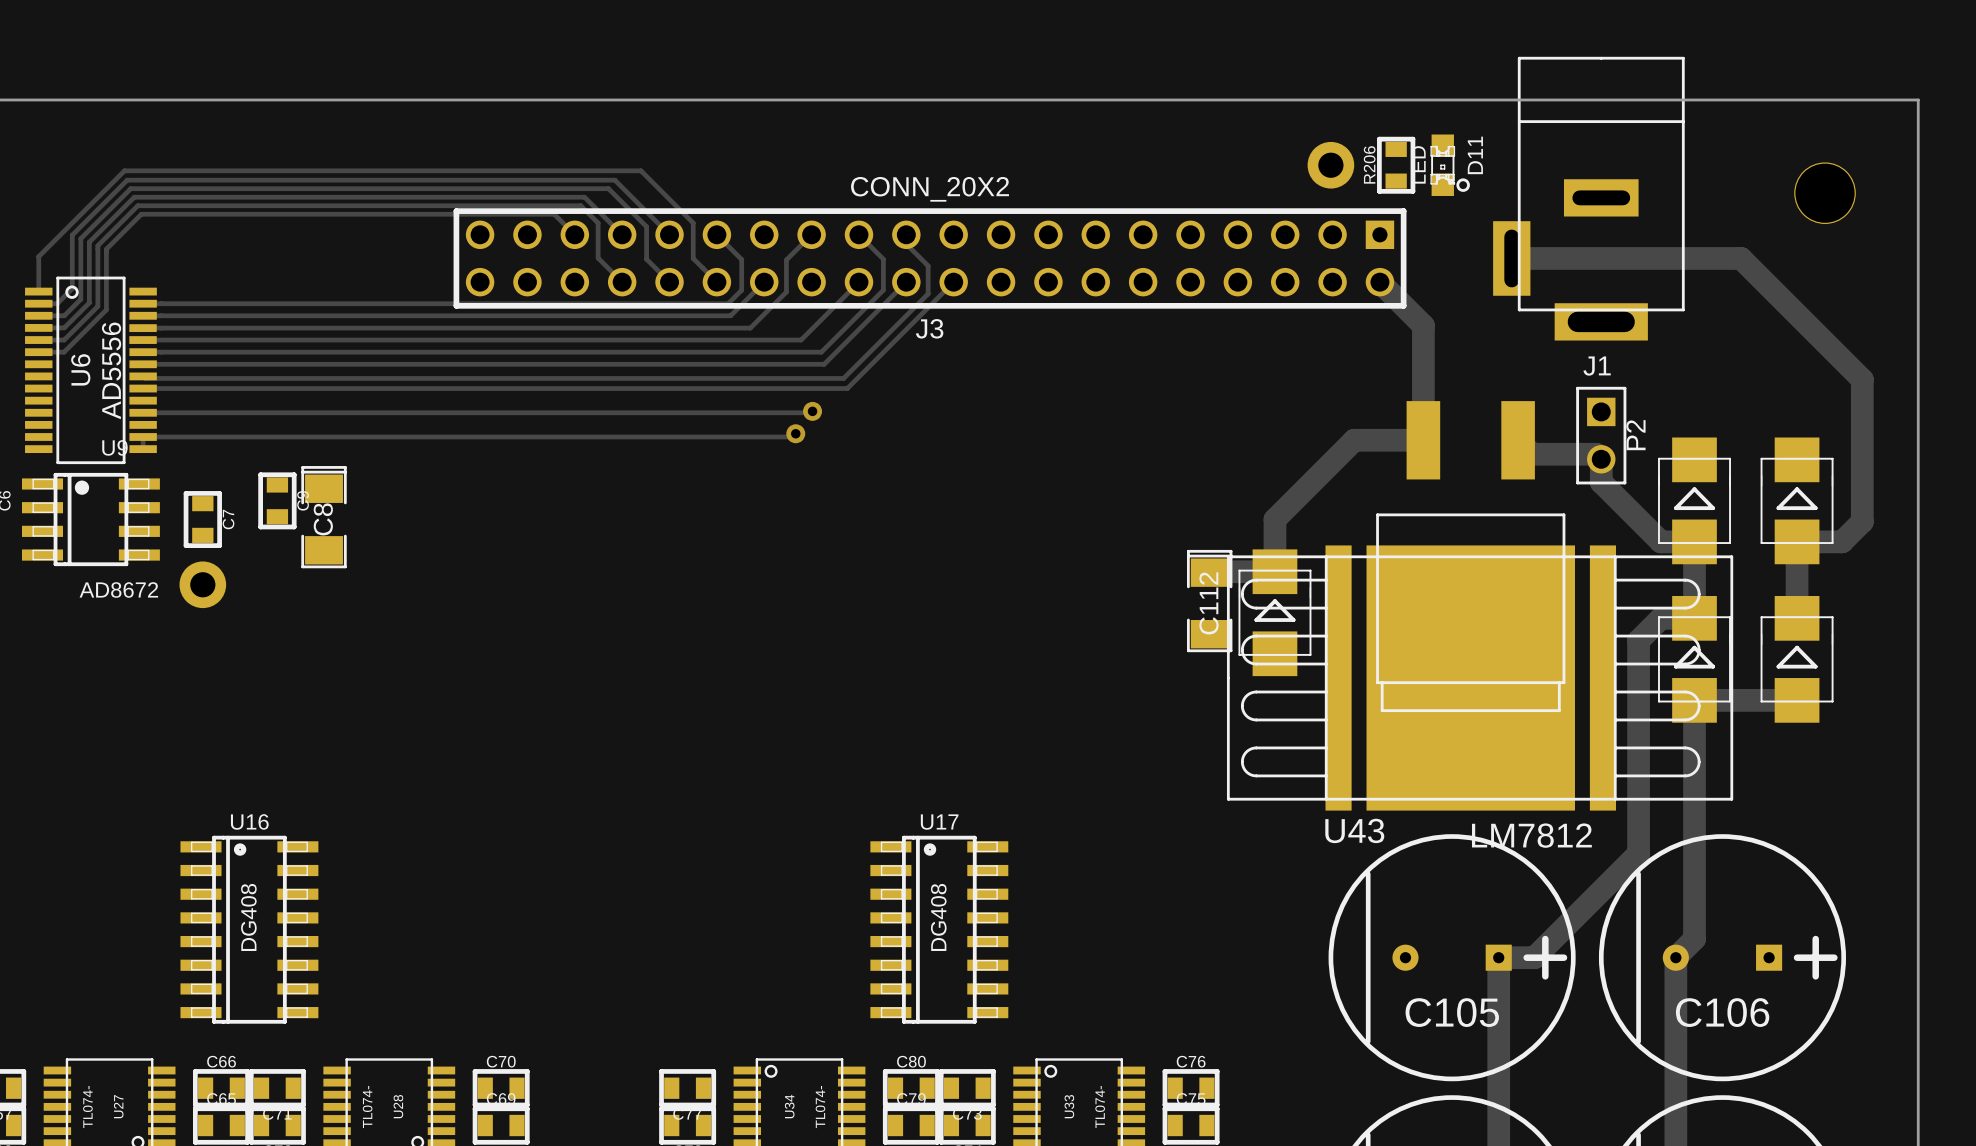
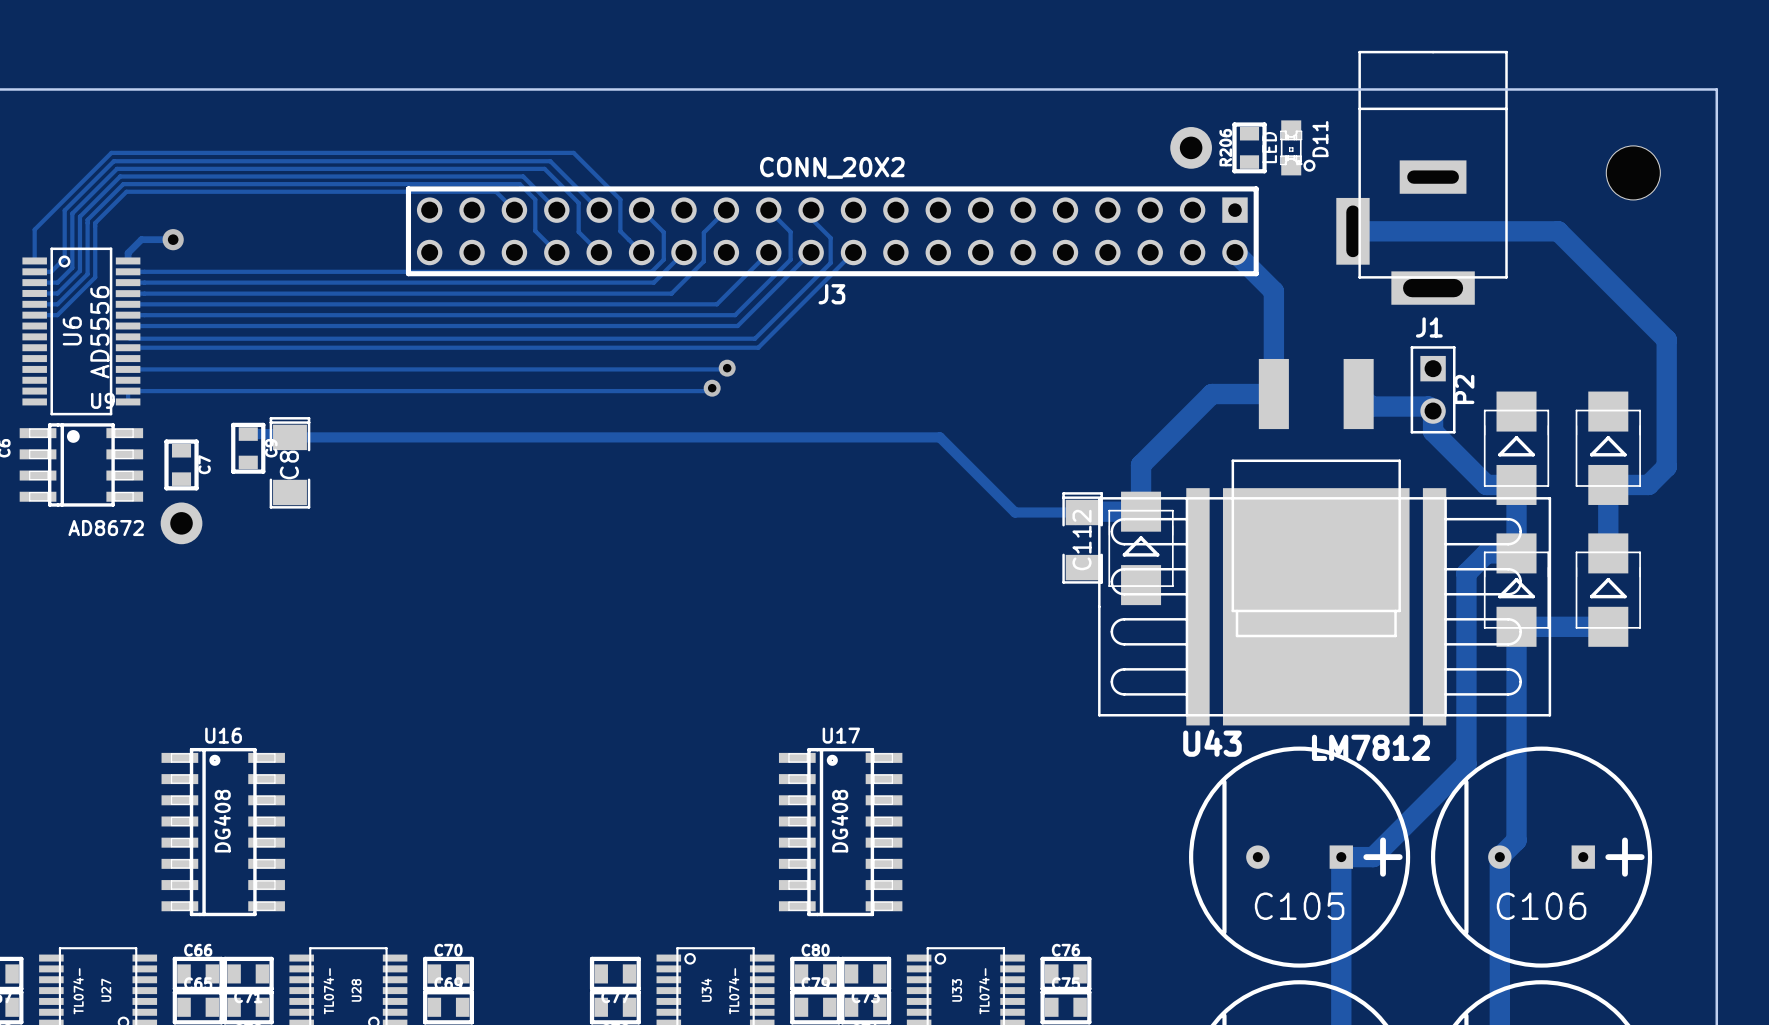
track: none -> (173, 239) (141, 239) (128, 253) (128, 260)
via: none -> (173, 239)
track: none -> (248, 434) (286, 434) (289, 437) (939, 437) (1015, 512) (1082, 512)

